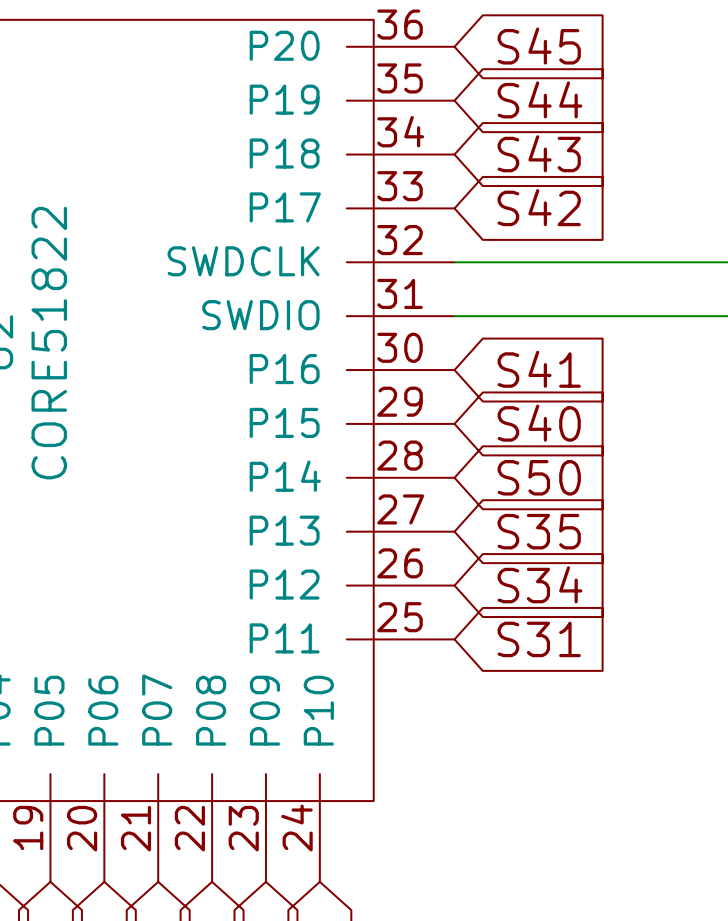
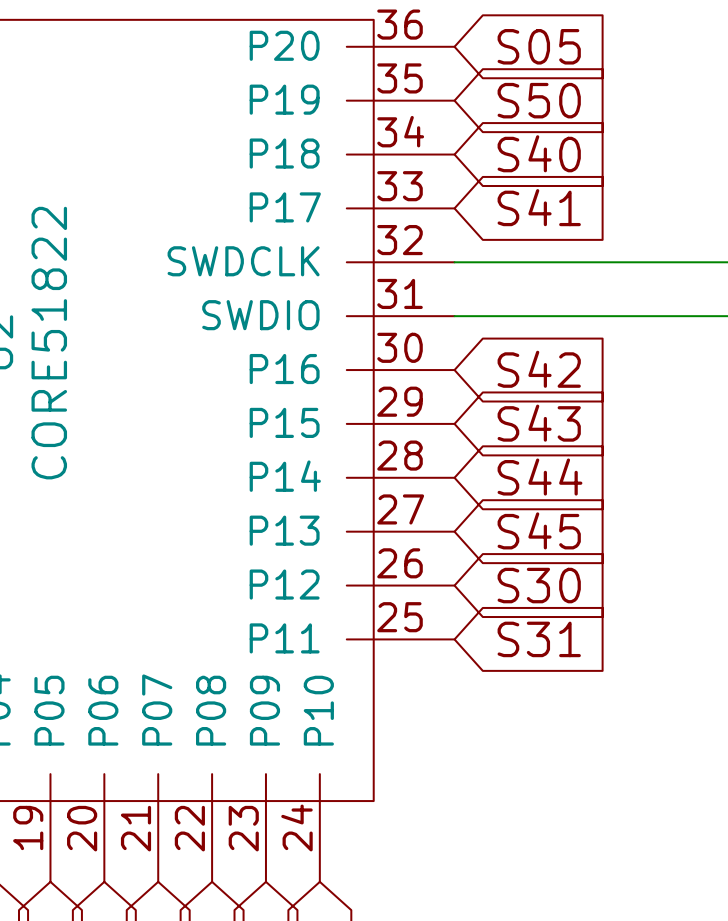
global label: S45 (539, 46) -> S05 (539, 46)
global label: S44 (539, 99) -> S50 (539, 100)
global label: S43 (539, 153) -> S40 (539, 153)
global label: S42 (539, 207) -> S41 (539, 207)
global label: S41 (539, 369) -> S42 (539, 369)
global label: S40 (539, 423) -> S43 (539, 423)
global label: S50 (539, 477) -> S44 (539, 477)
global label: S35 (539, 531) -> S45 (539, 530)
global label: S34 (539, 584) -> S30 (539, 585)

